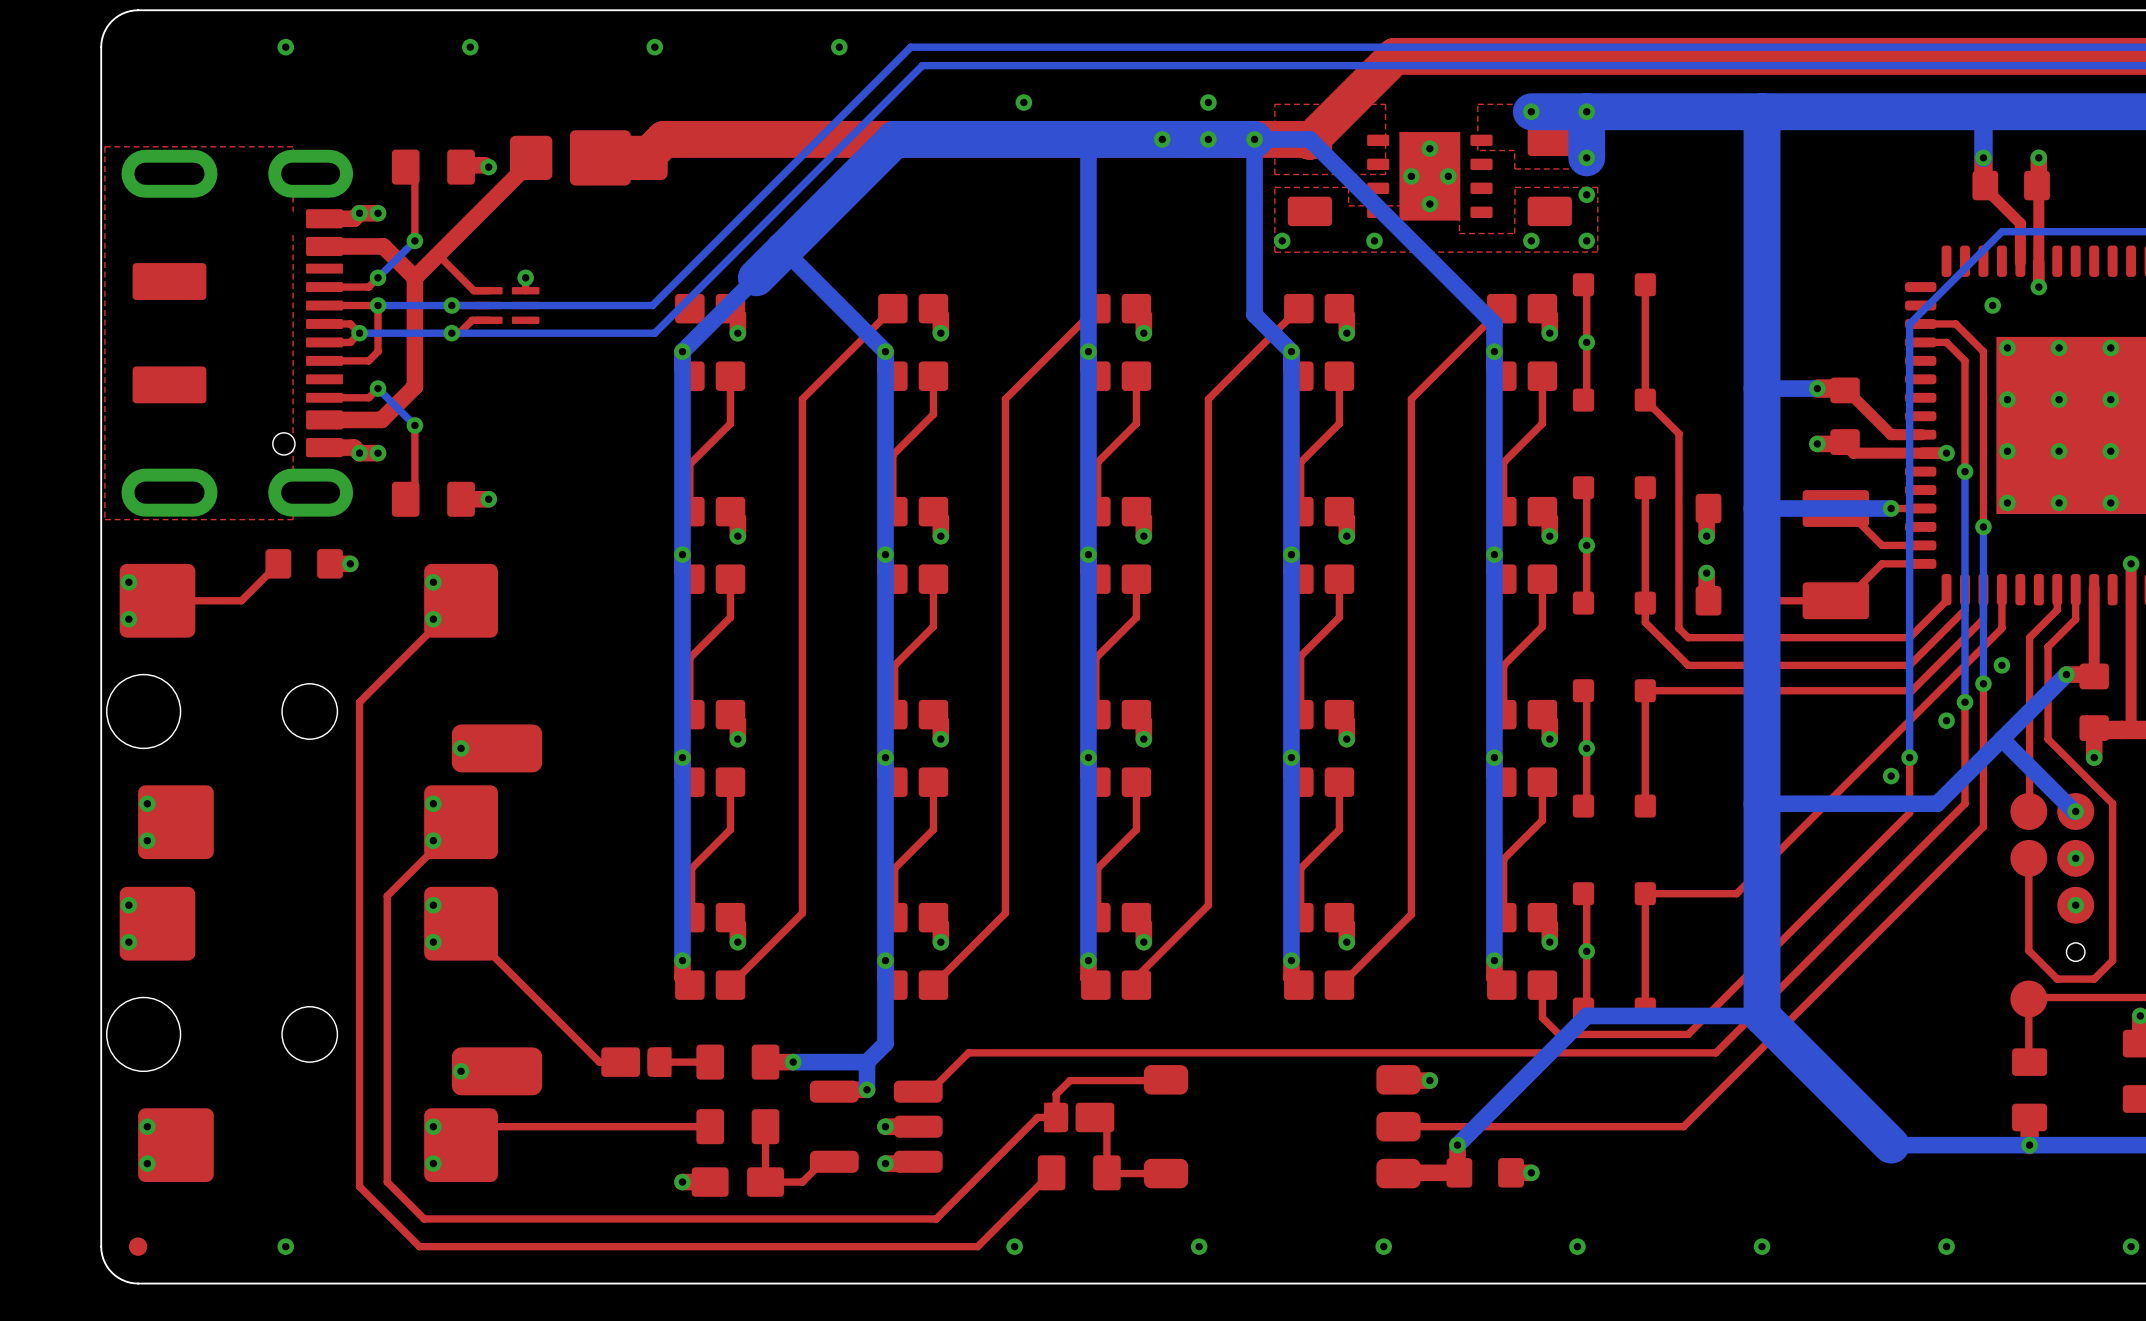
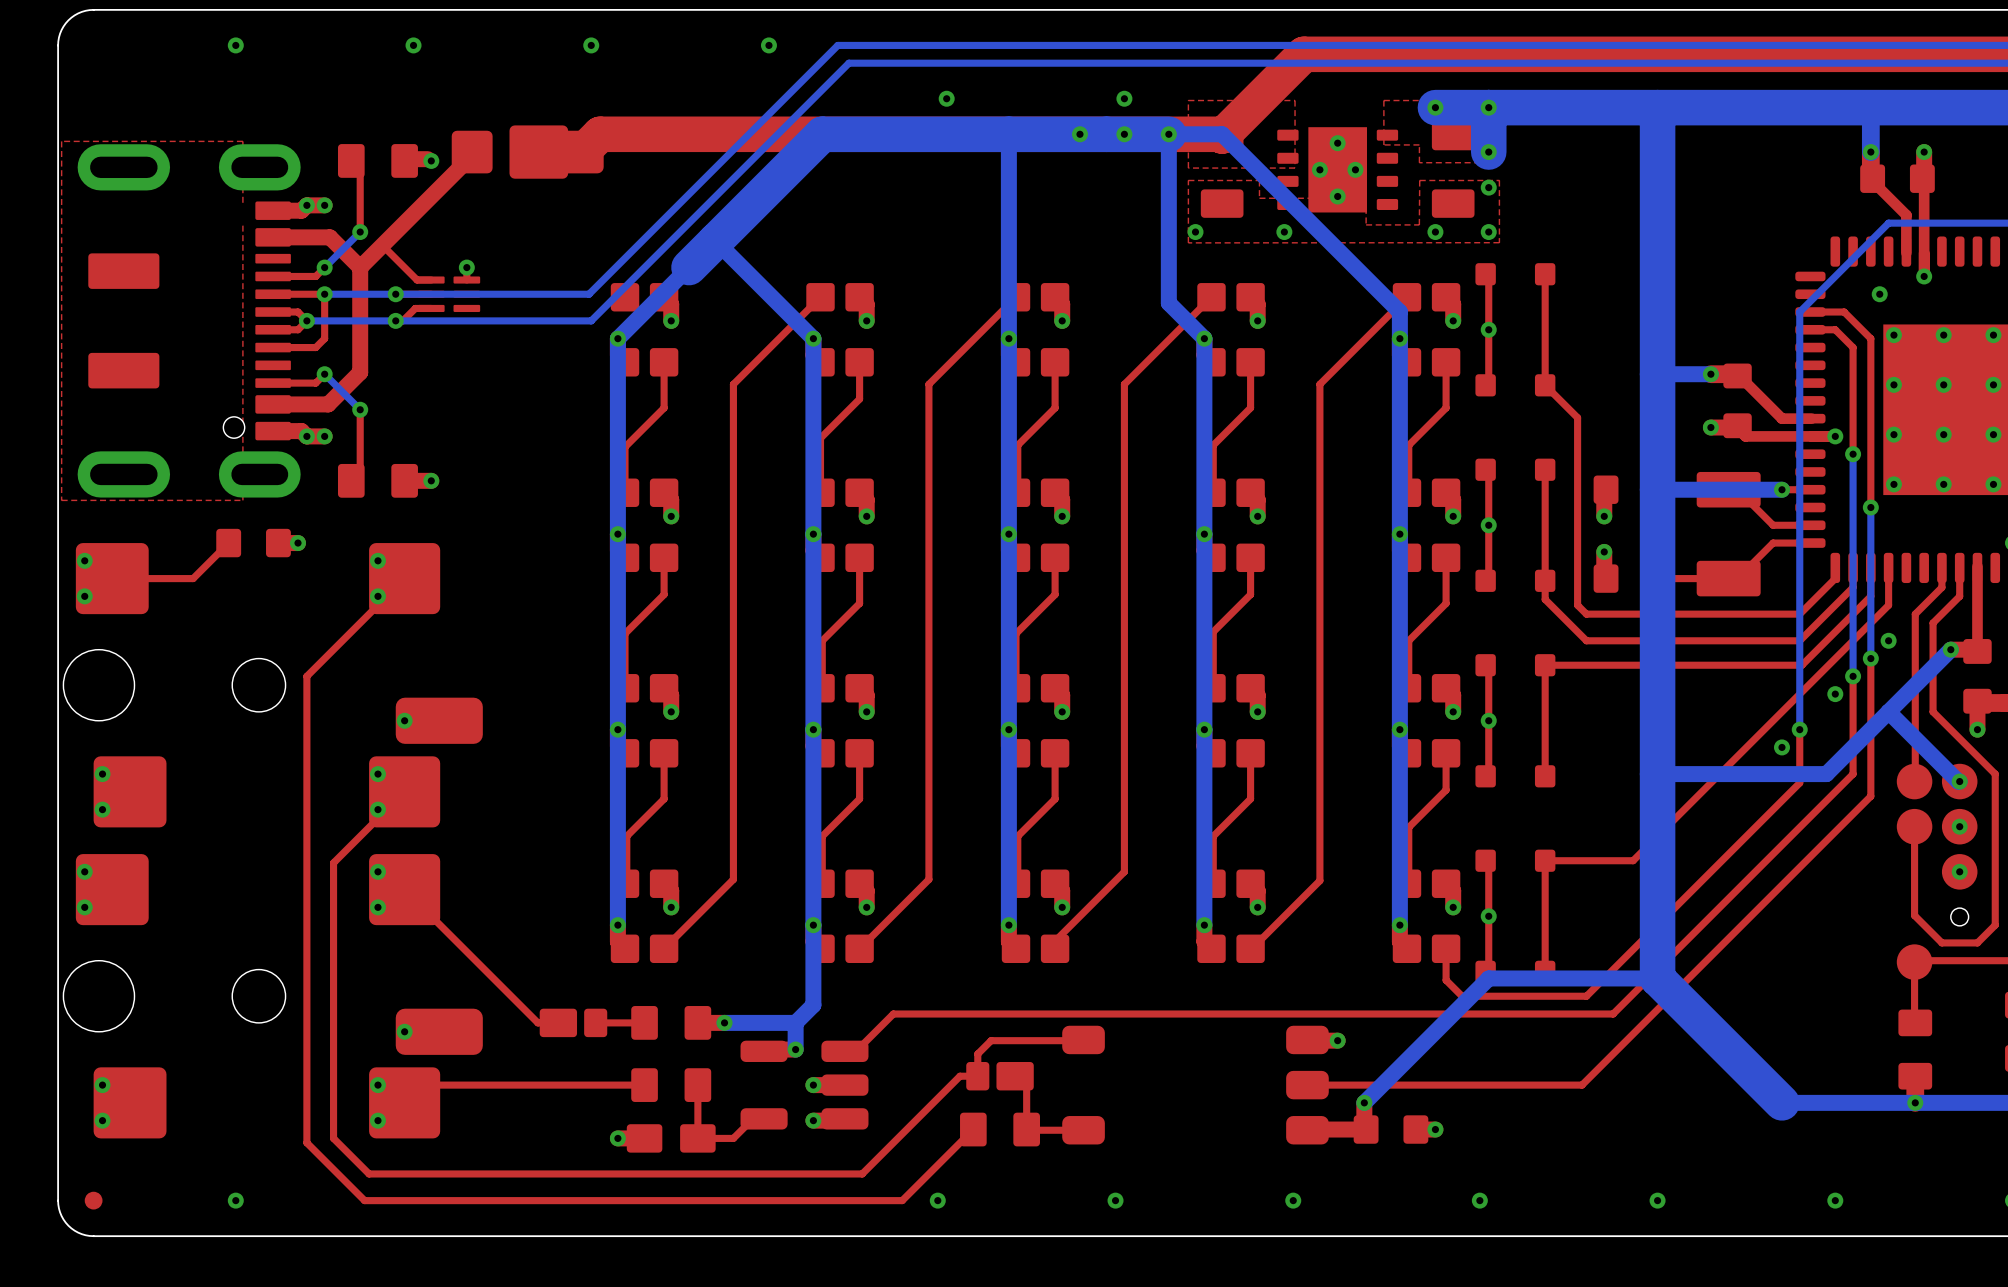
part footprint: [601, 1047, 672, 1077] -> [539, 1008, 608, 1038]
part footprint: [1044, 1102, 1115, 1133] -> [966, 1062, 1034, 1091]

